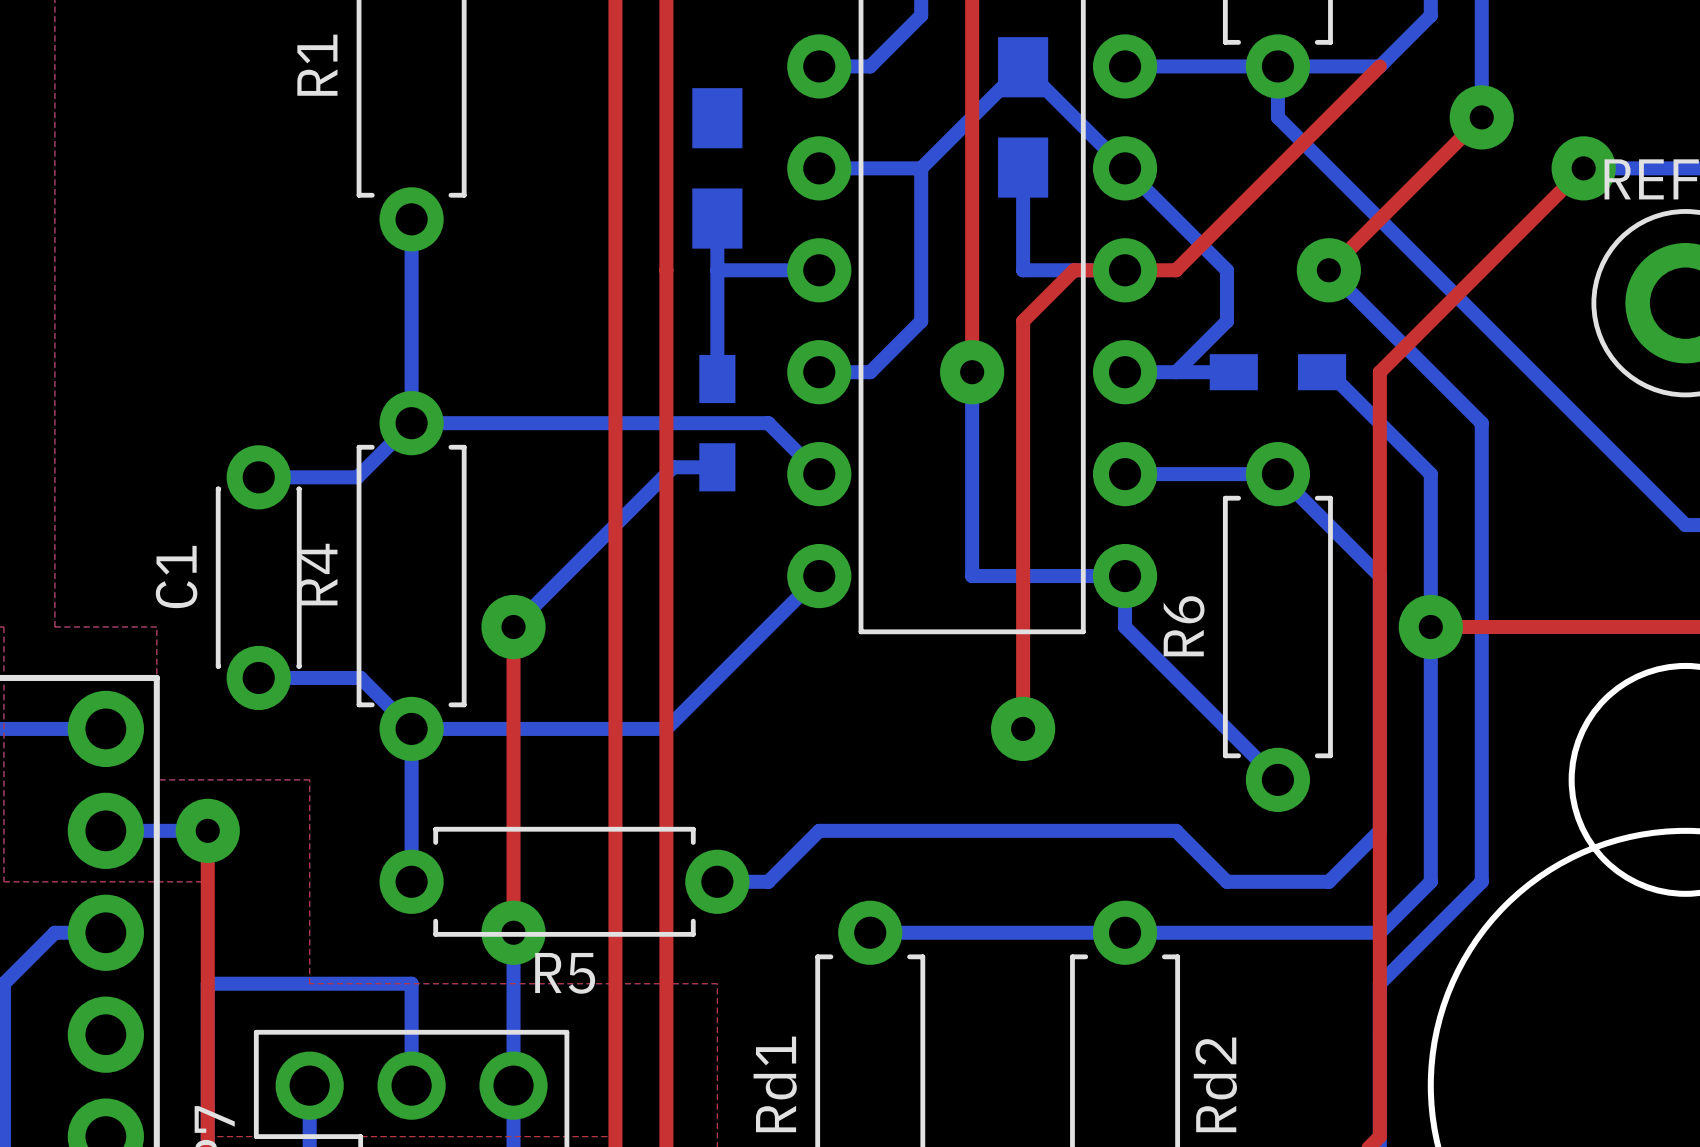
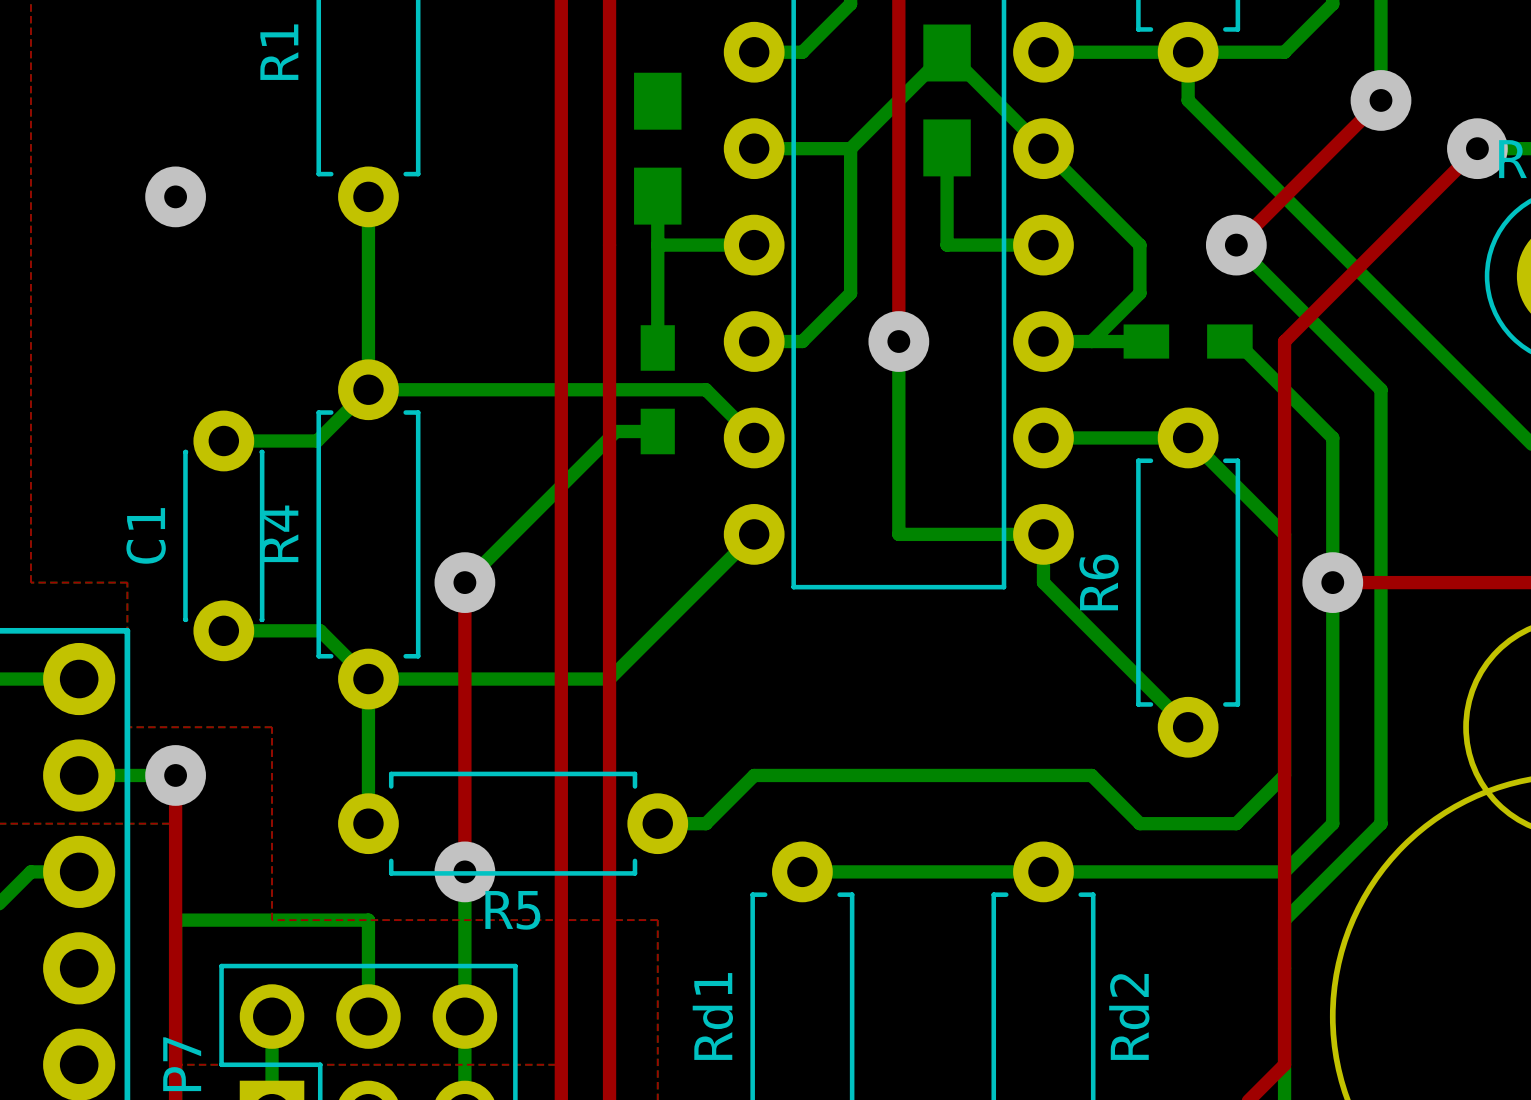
top track: (1379, 66) (1176, 270) (1074, 270) (1023, 321) (1023, 728) -> none
via: none -> (175, 196)
via: (1023, 728) -> none

